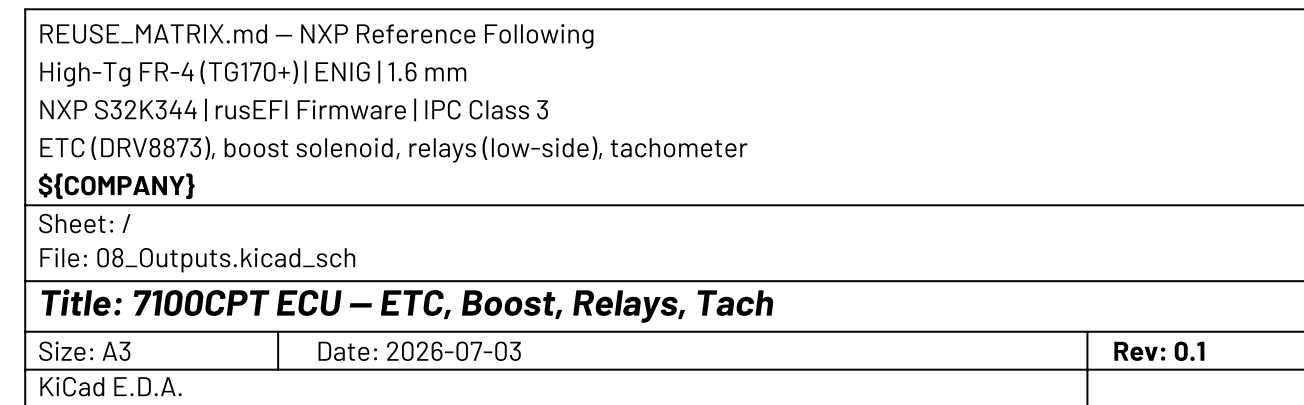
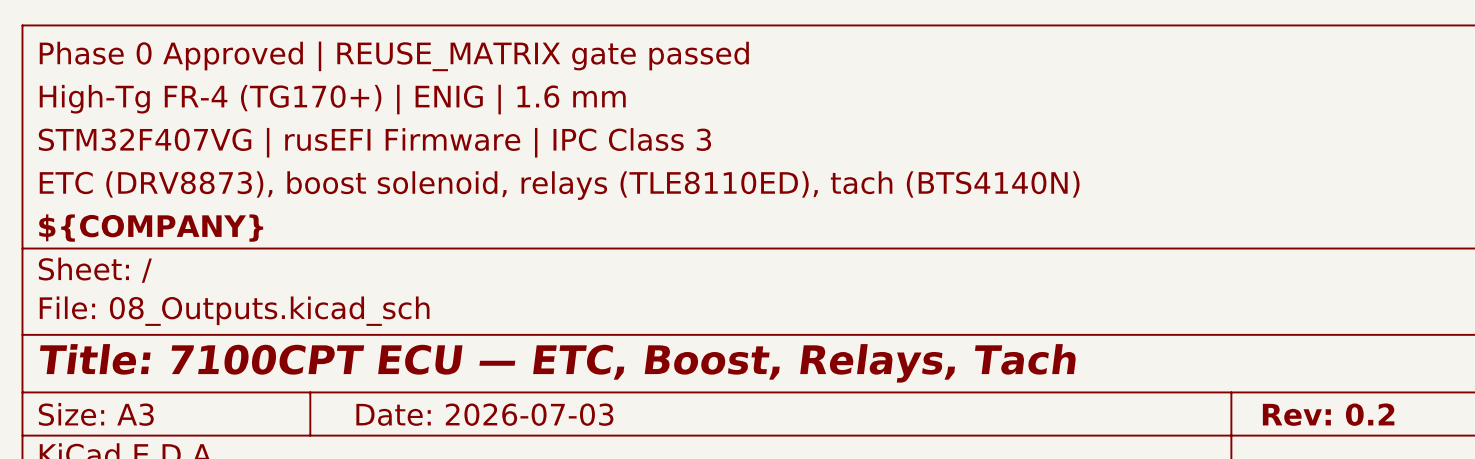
title block: REUSE_MATRIX.md — NXP Reference Following (316, 36) -> Phase 0 Approved | REUSE_MATRIX gate passed (394, 56)
title block: NXP S32K344 | rusEFI Firmware | IPC Class 3 (294, 110) -> STM32F407VG | rusEFI Firmware | IPC Class 3 (374, 142)
title block: ETC (DRV8873), boost solenoid, relays (low-side), tachometer (393, 149) -> ETC (DRV8873), boost solenoid, relays (TLE8110ED), tach (BTS4140N) (559, 185)
title block: Rev: 0.1 (1159, 351) -> Rev: 0.2 (1328, 414)

